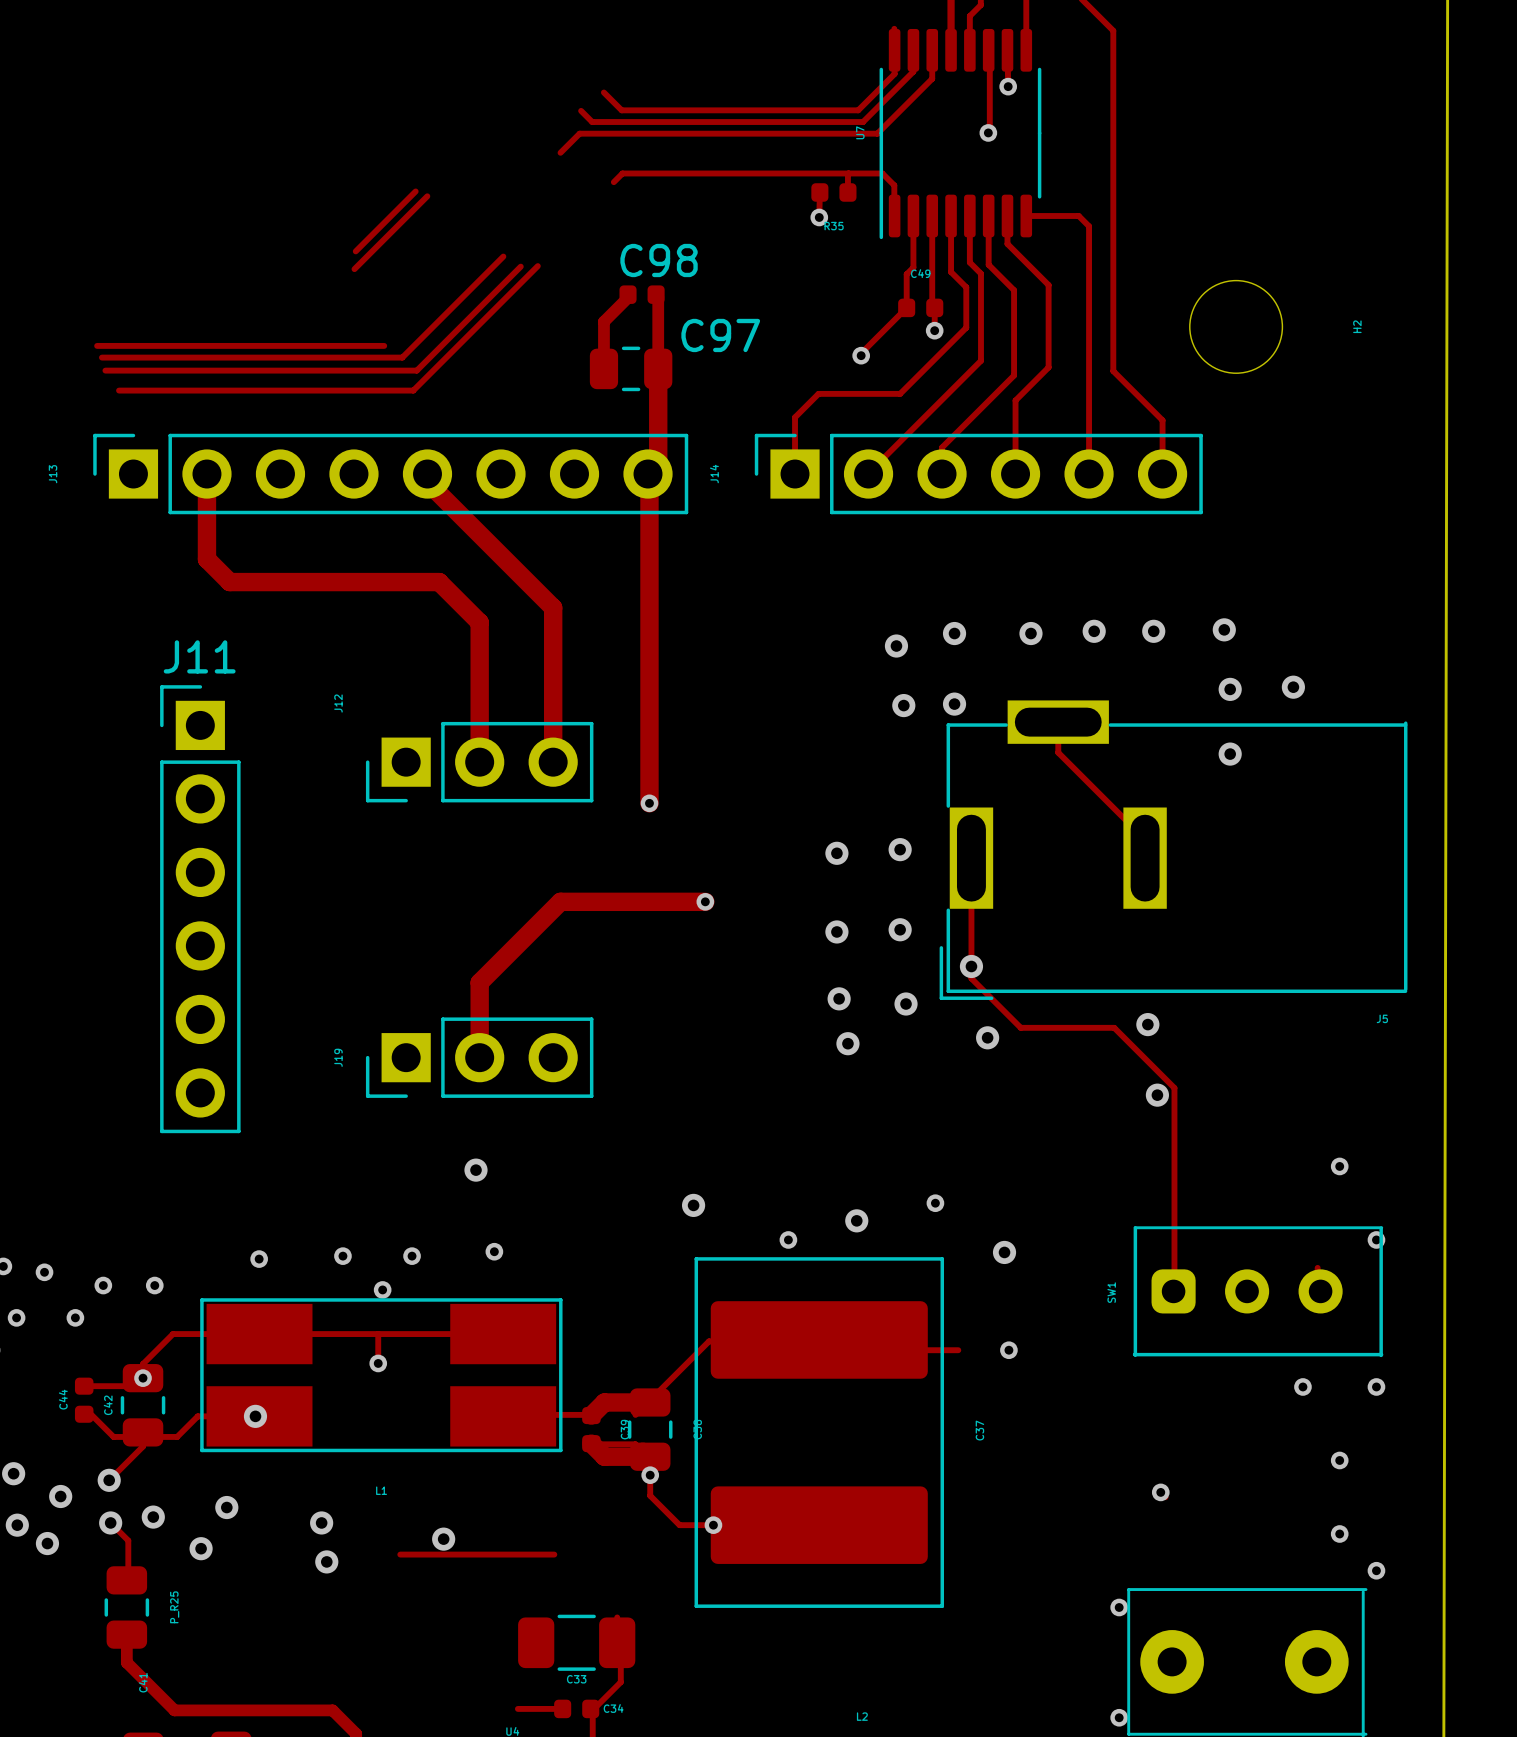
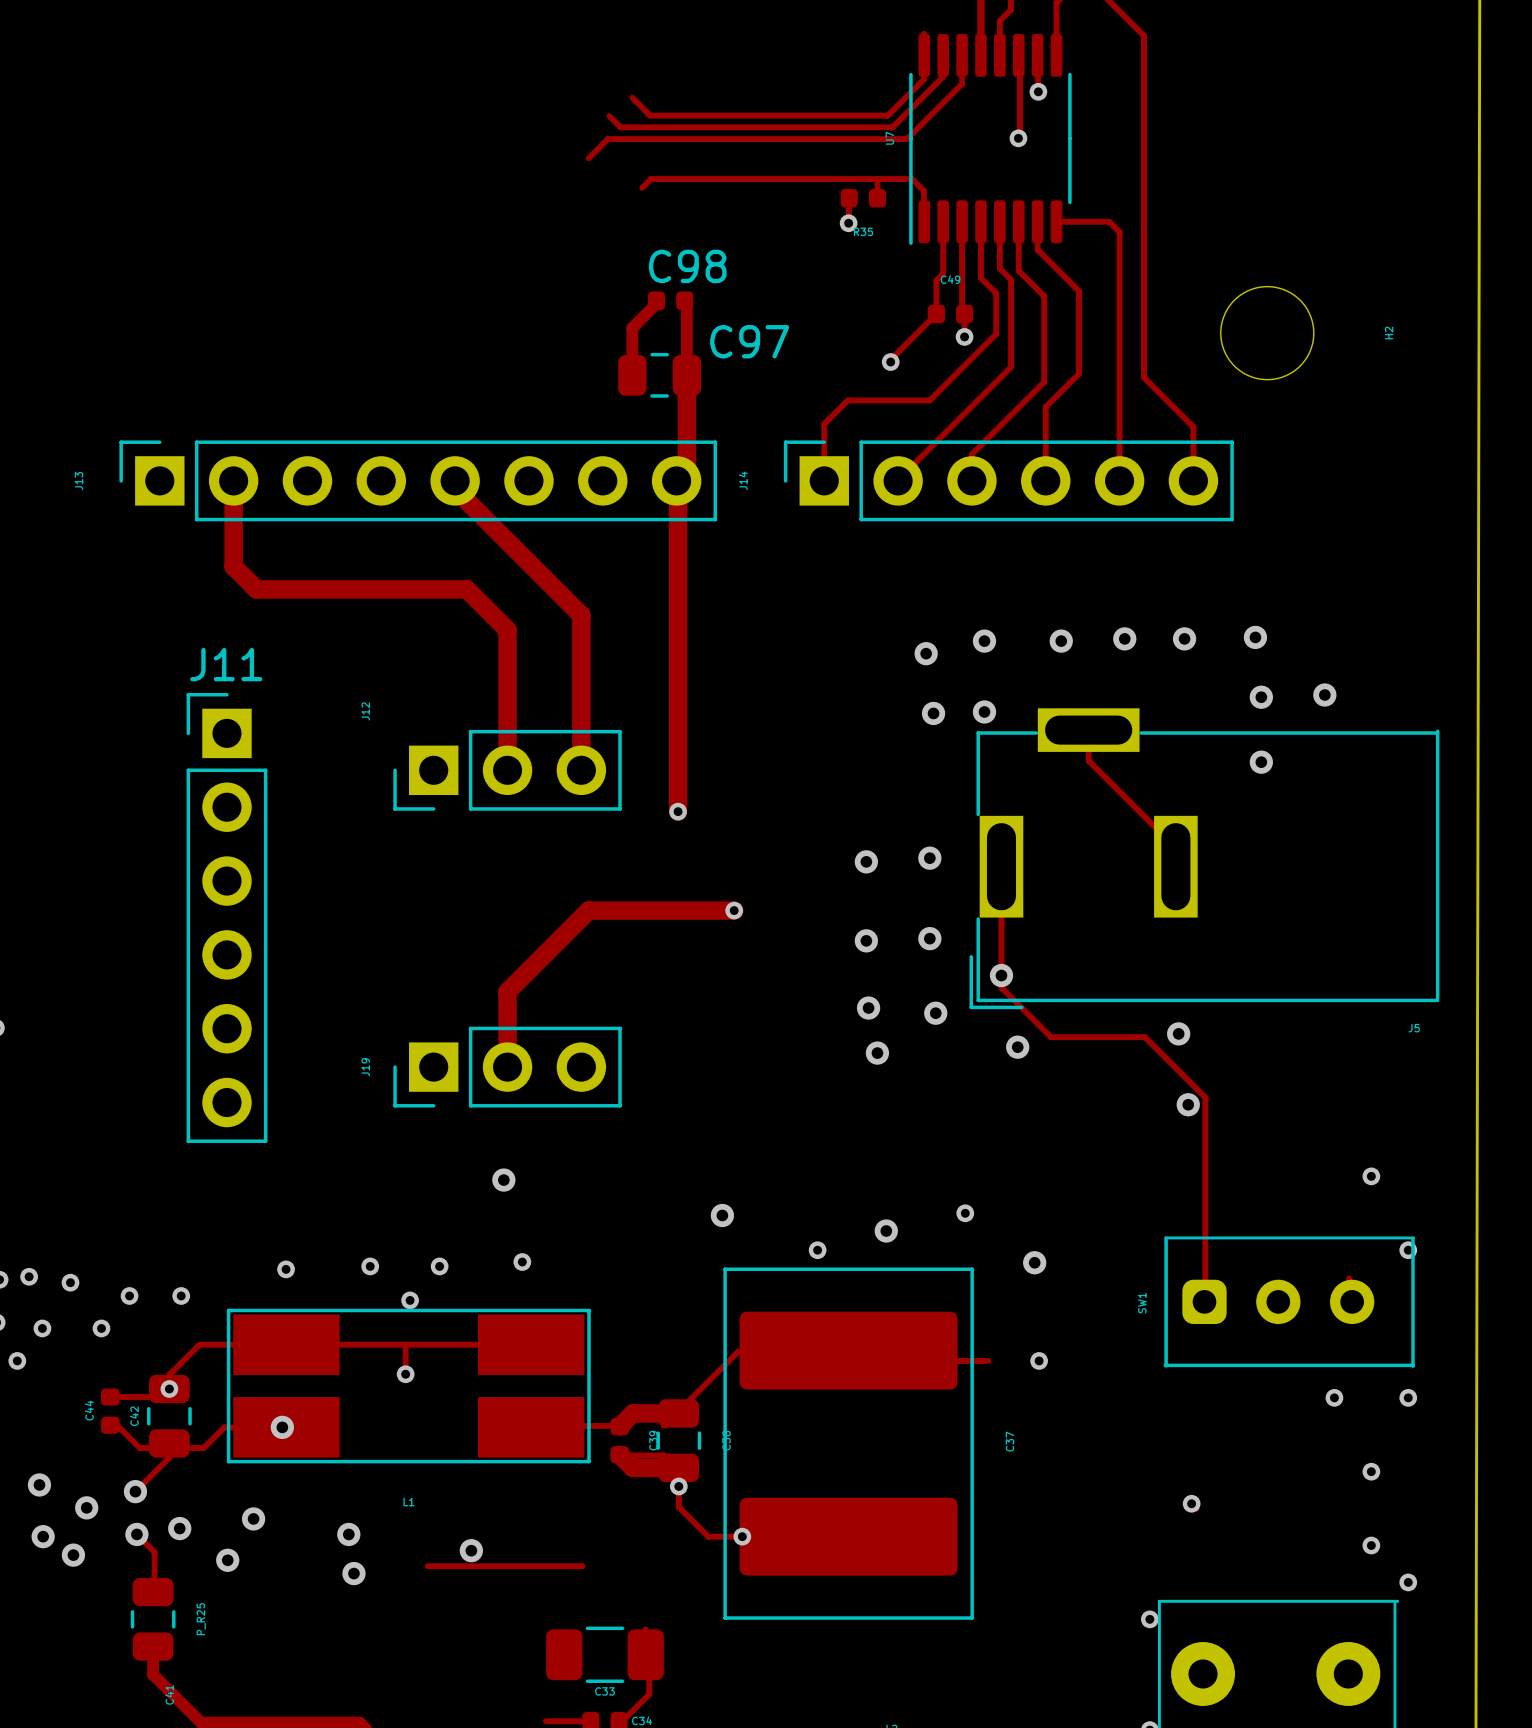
track: (415, 191) (355, 251) -> none
track: (427, 196) (354, 269) -> none
track: (503, 256) (402, 357) (101, 357) -> none
track: (520, 266) (416, 370) (105, 370) -> none
track: (537, 266) (413, 390) (119, 390) -> none
track: (97, 345) (384, 345) -> none

